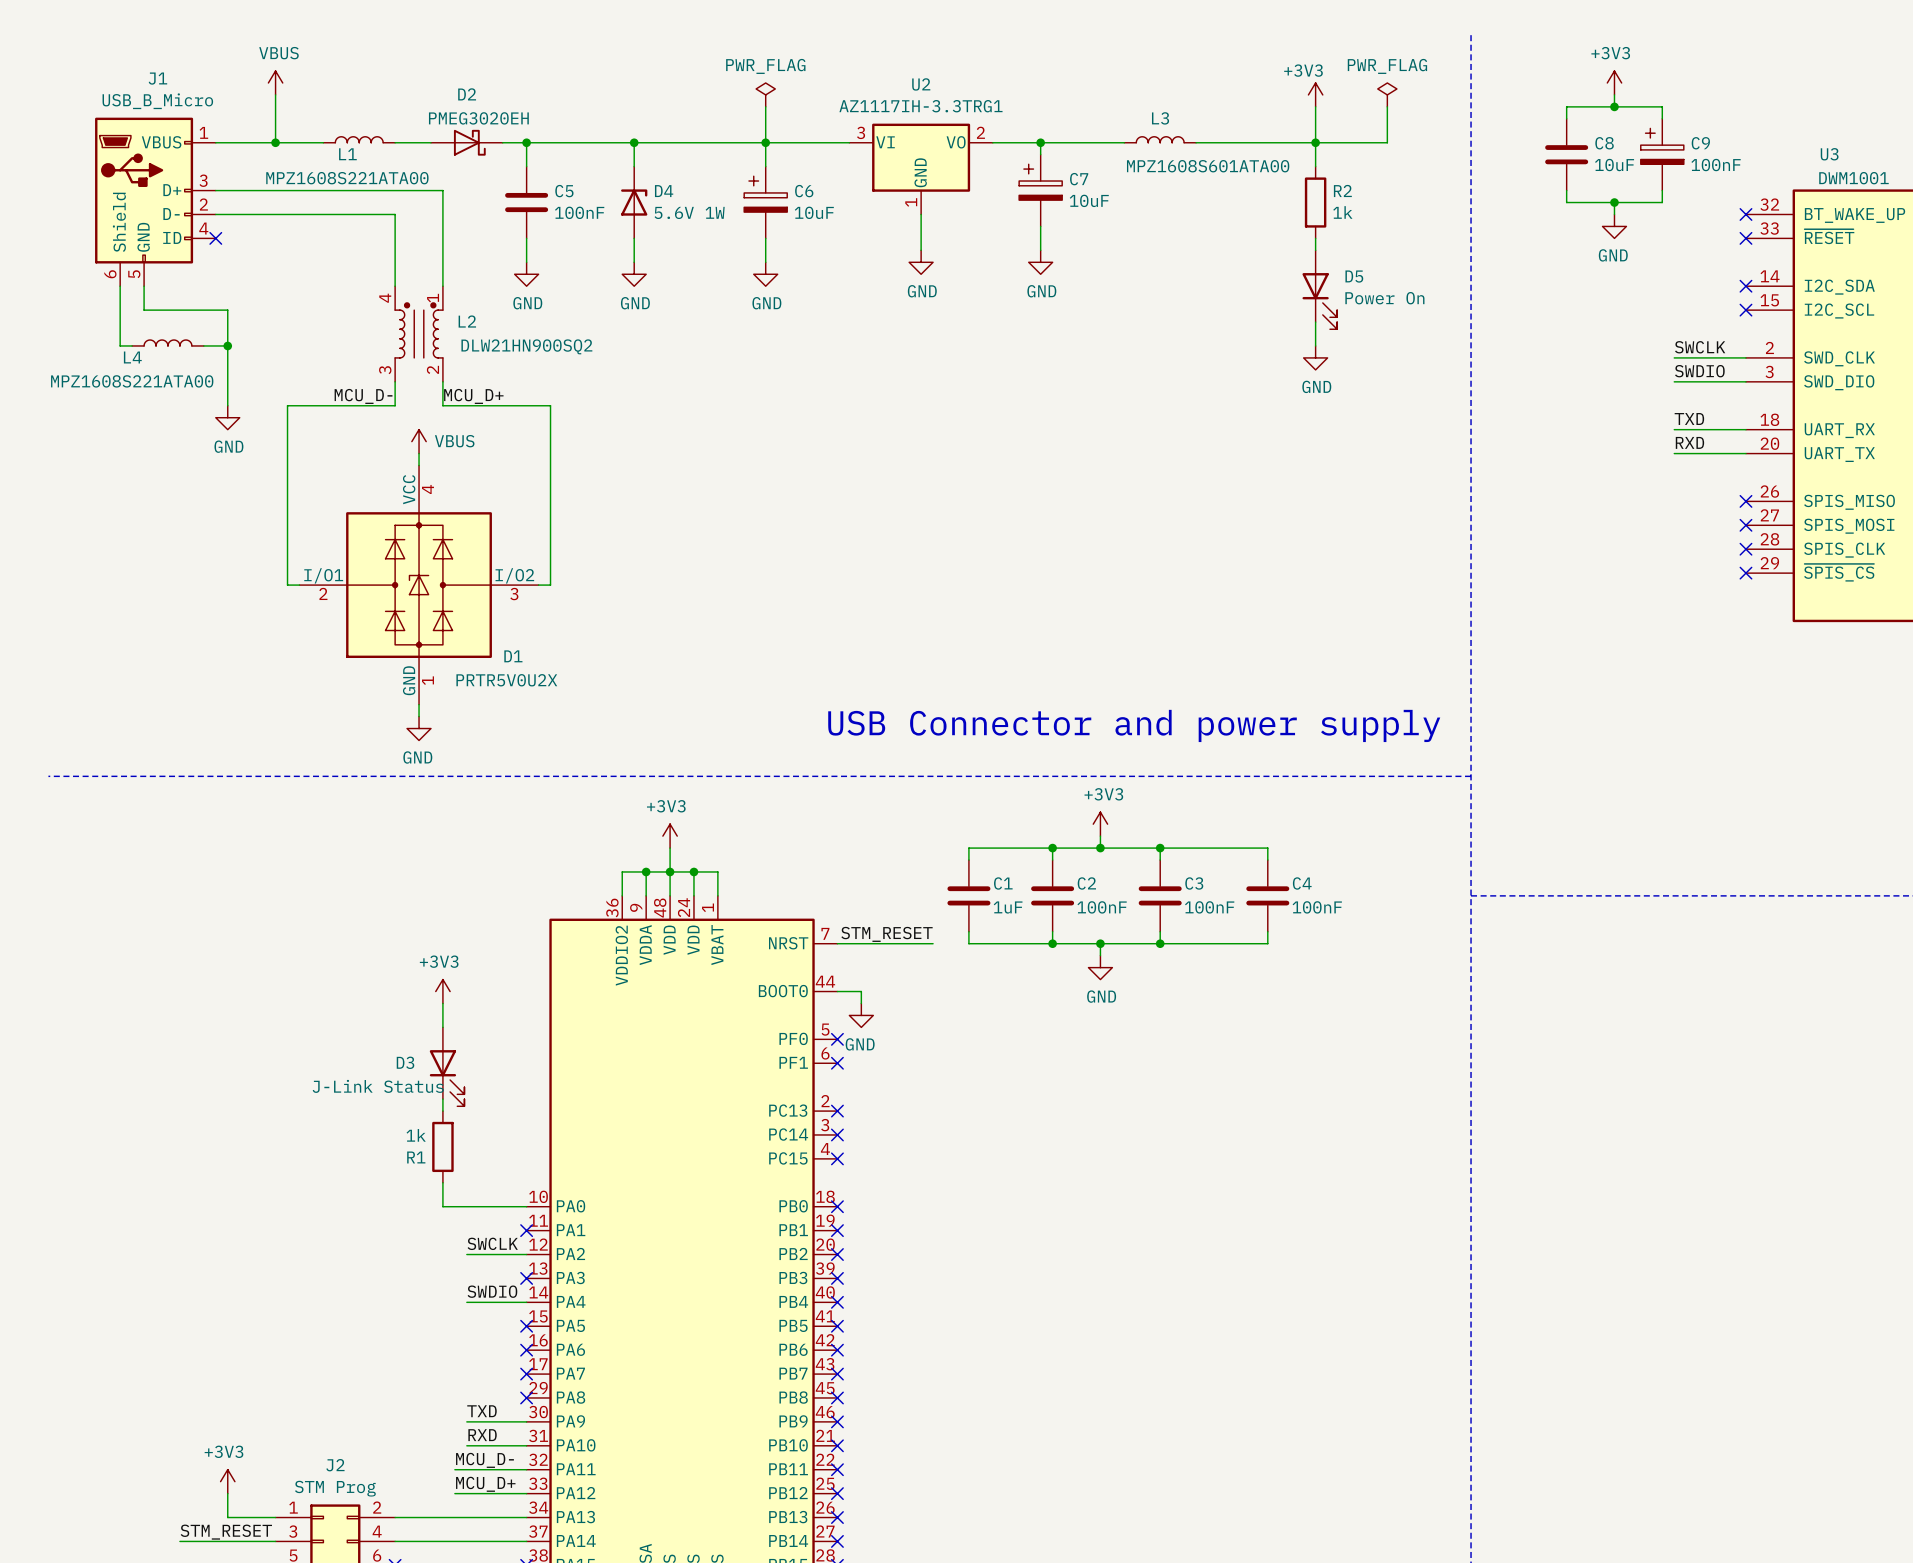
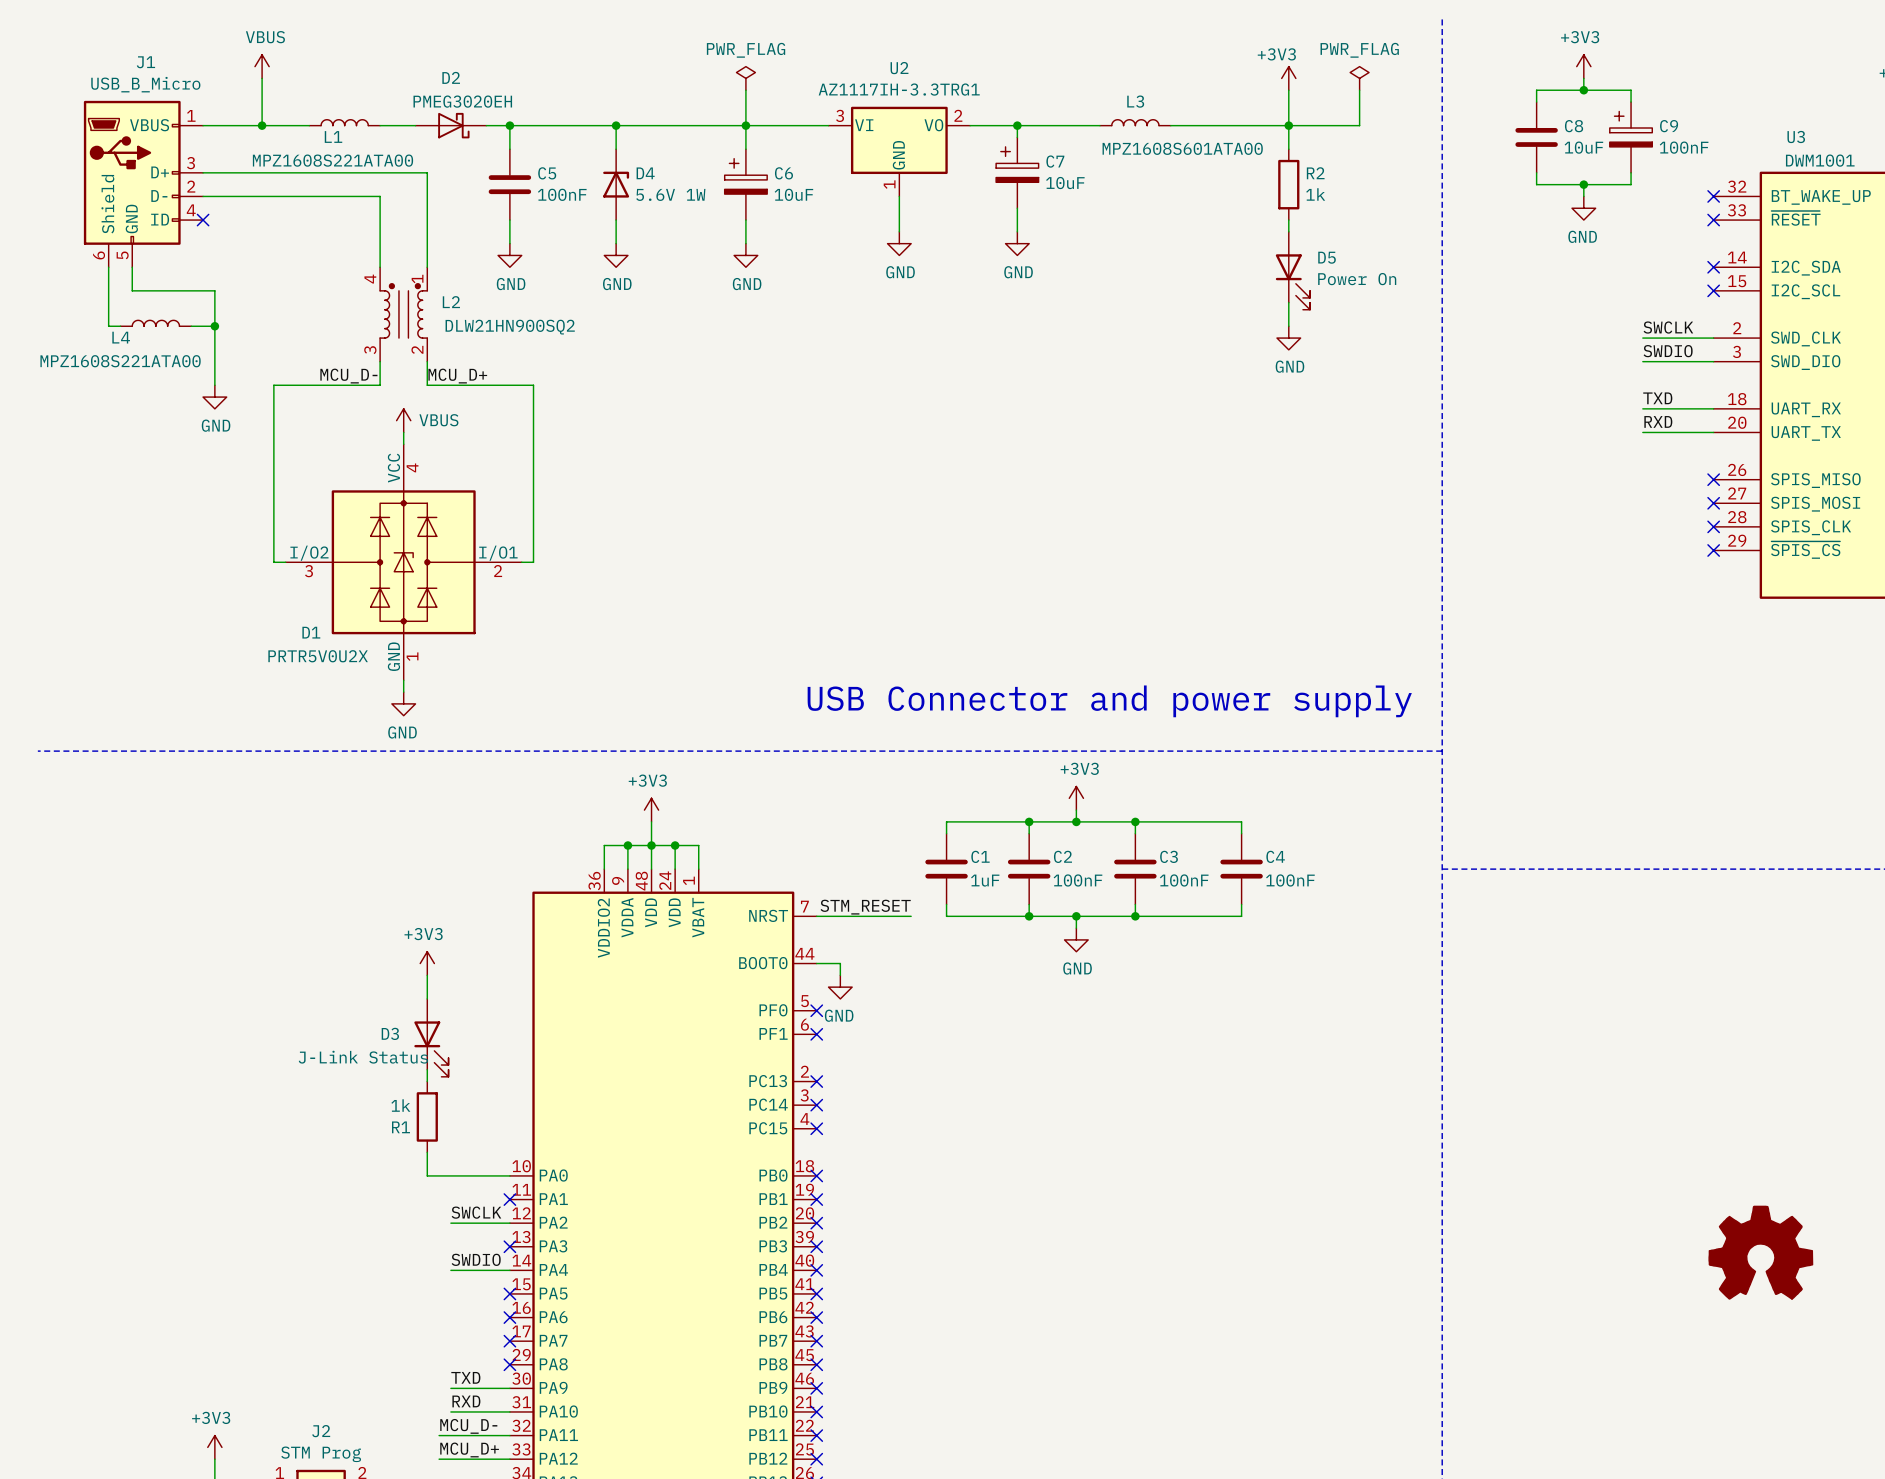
D1 flip: as is (419, 585) -> left-right (403, 562)
power symbol: none -> (1760, 1252)

